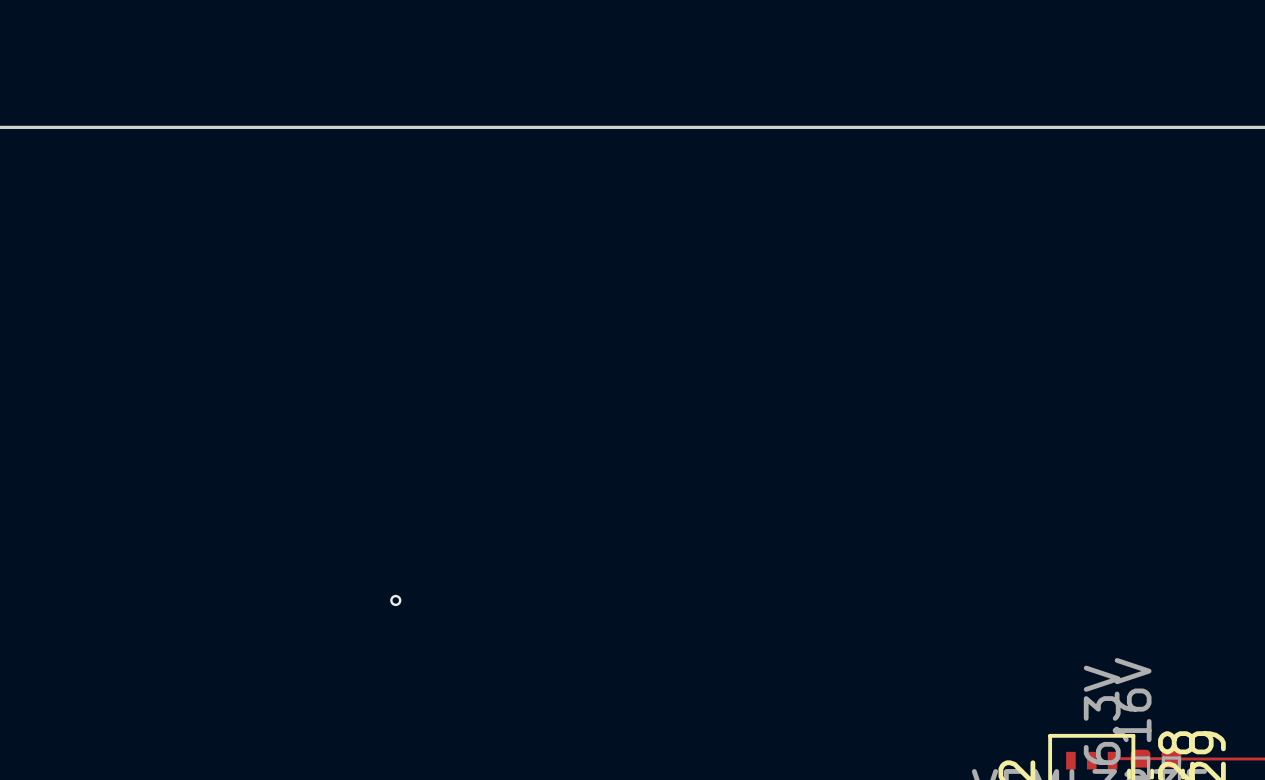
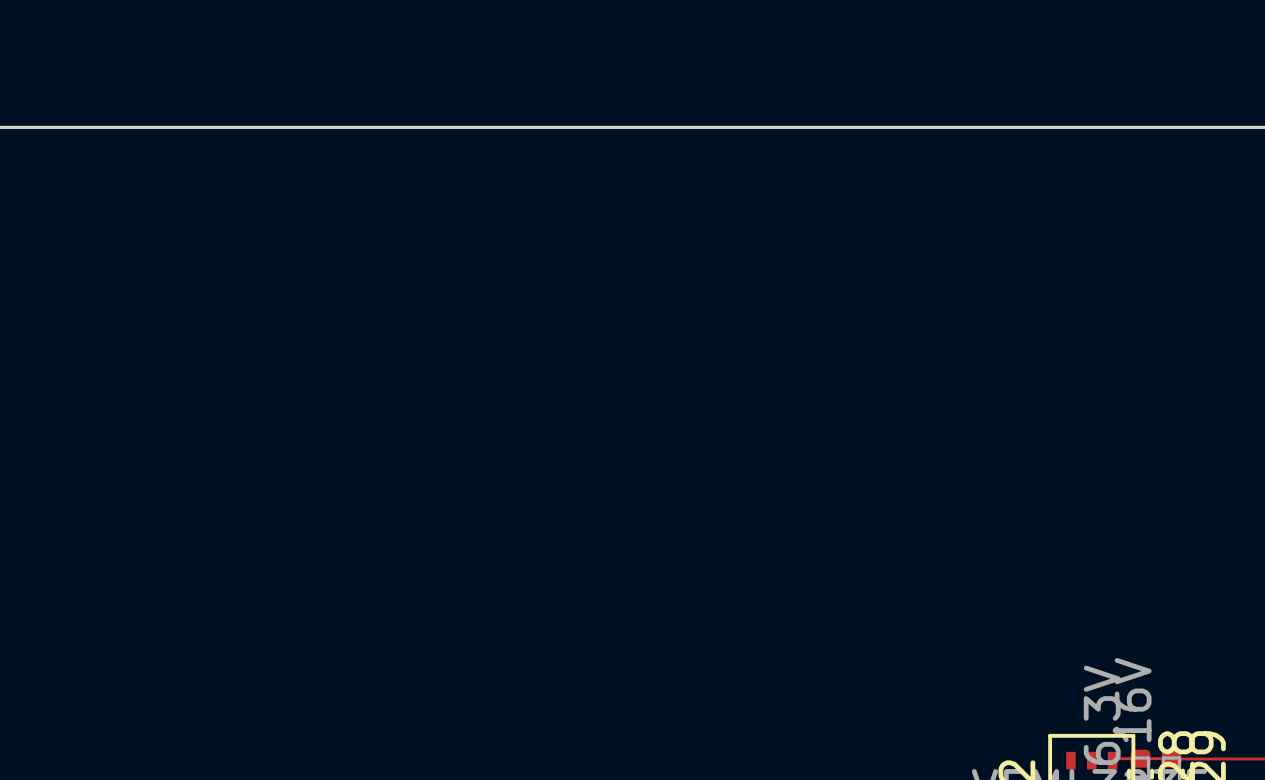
via: (395, 600) -> none

